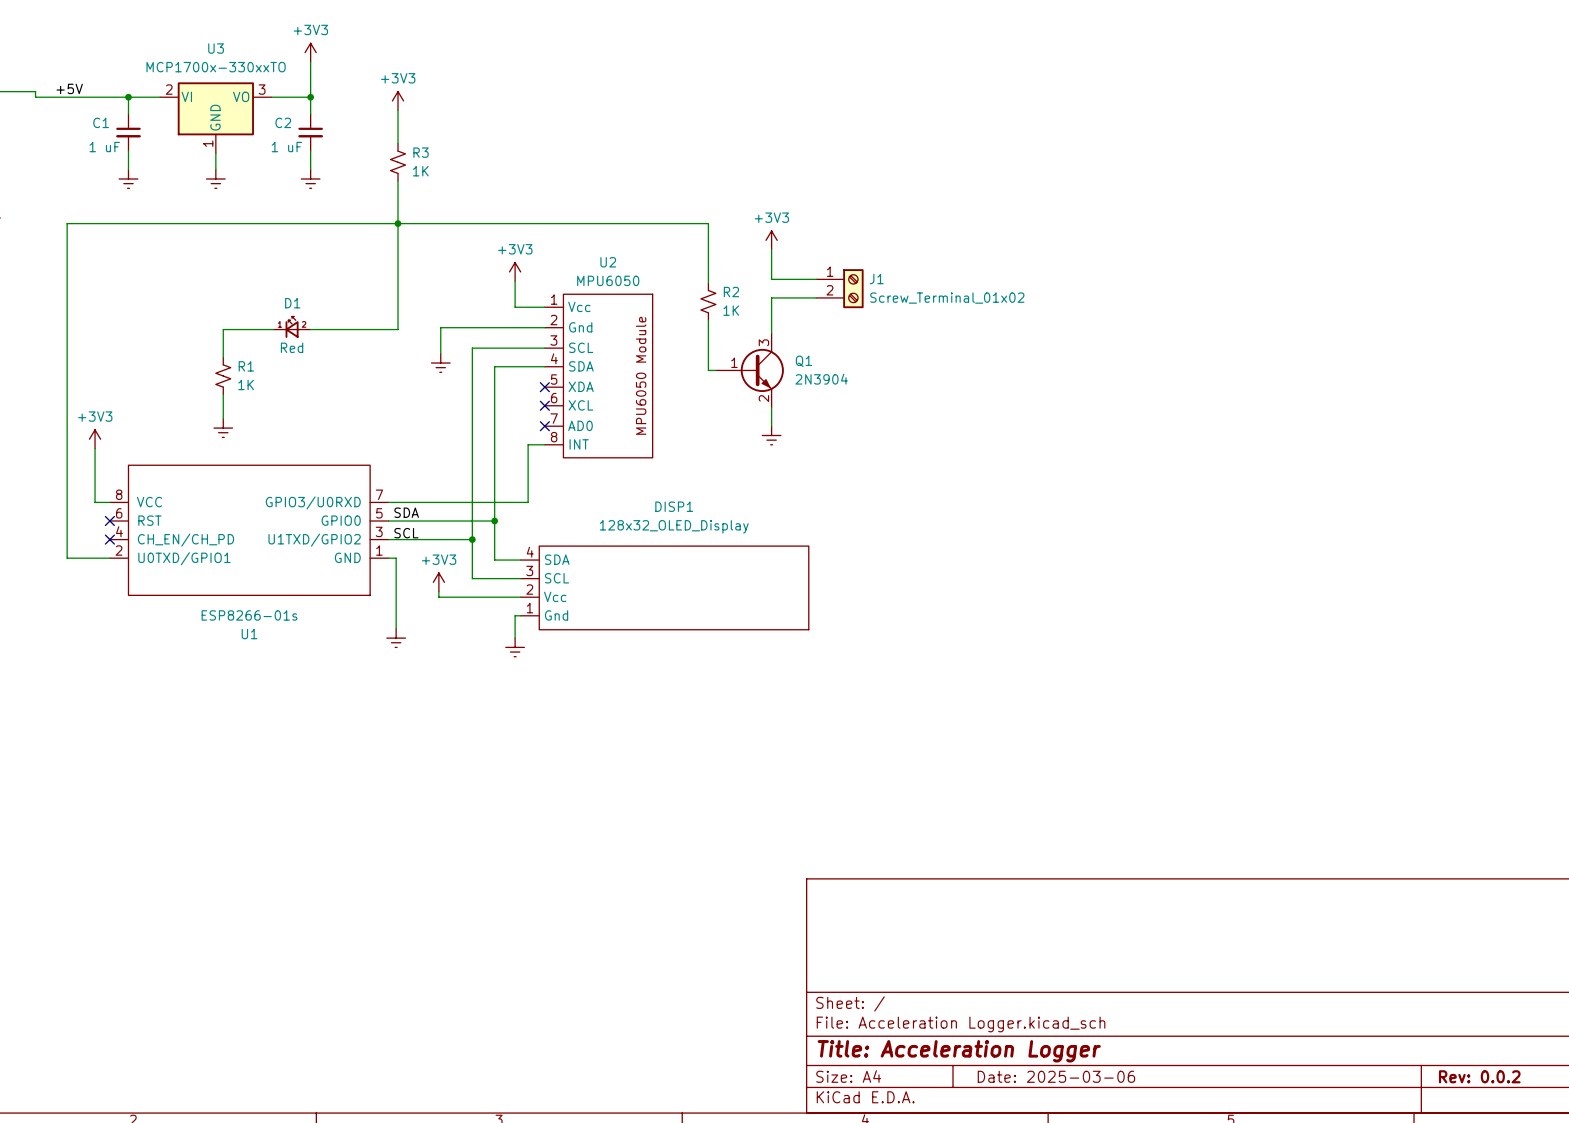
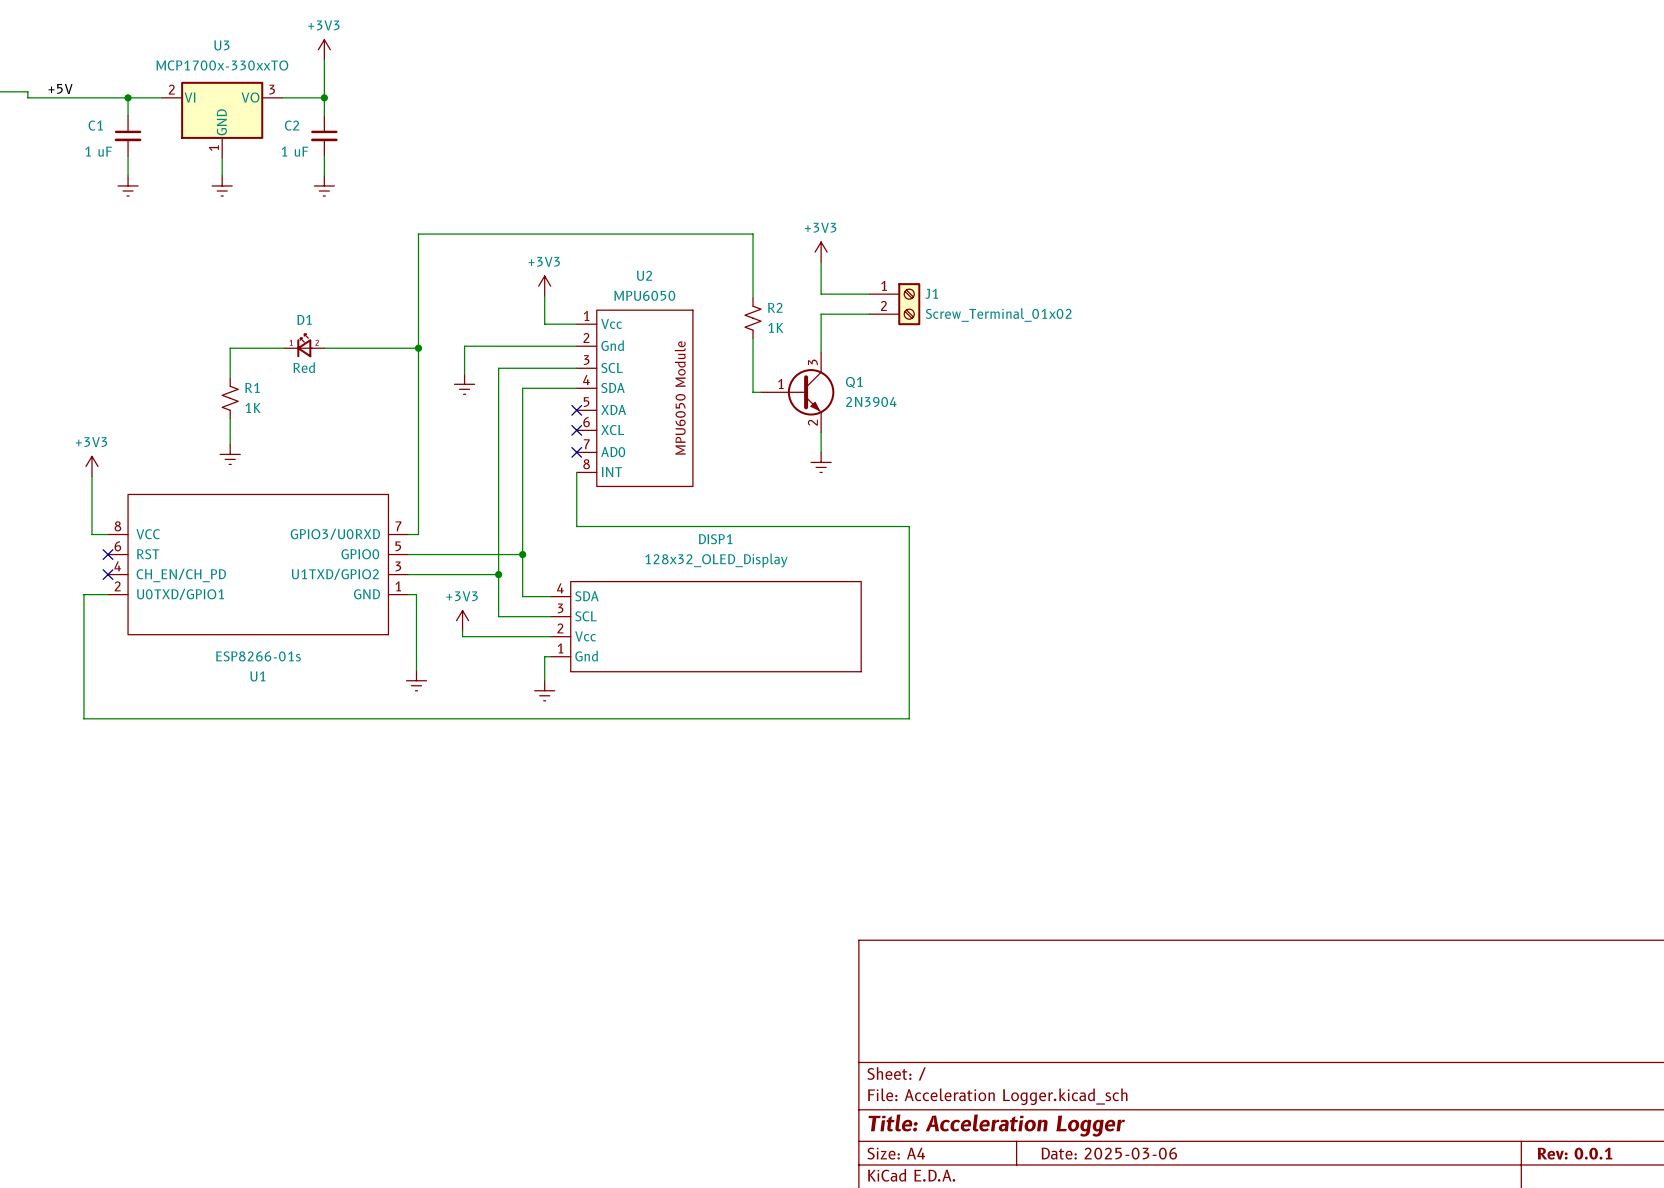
power symbol: +3V3 (398, 100) -> none
wire: (398, 110) (398, 143) -> none
R3: 1K (398, 162) -> none
wire: (398, 180) (398, 223) (67, 223) (67, 558) (87, 558) -> (576, 472) (576, 526) (909, 526) (909, 718) (83, 718) (83, 594)
junction: (398, 223) -> none
junction: none -> (418, 348)
wire: (544, 444) (528, 444) (528, 502) (398, 502) -> (418, 348) (418, 534)
label: SDA (406, 512) -> none
label: SCL (406, 533) -> none
title block: Rev: 0.0.2 (1479, 1076) -> Rev: 0.0.1 (1575, 1153)

